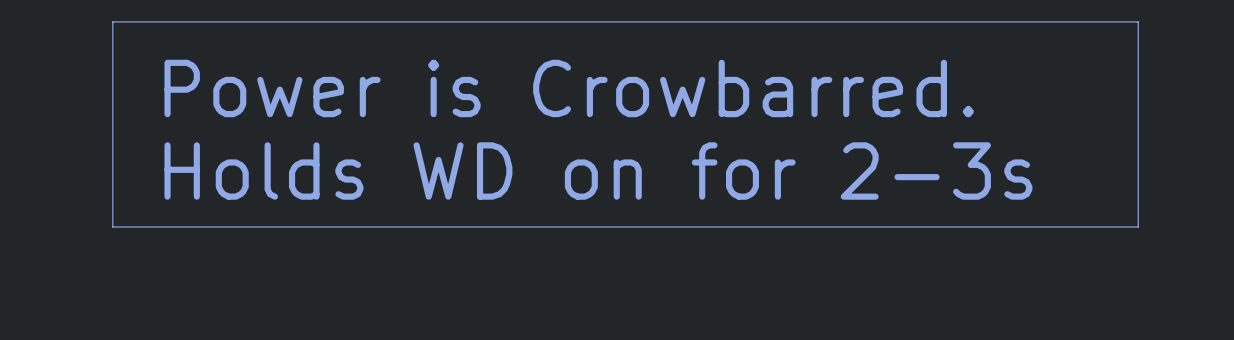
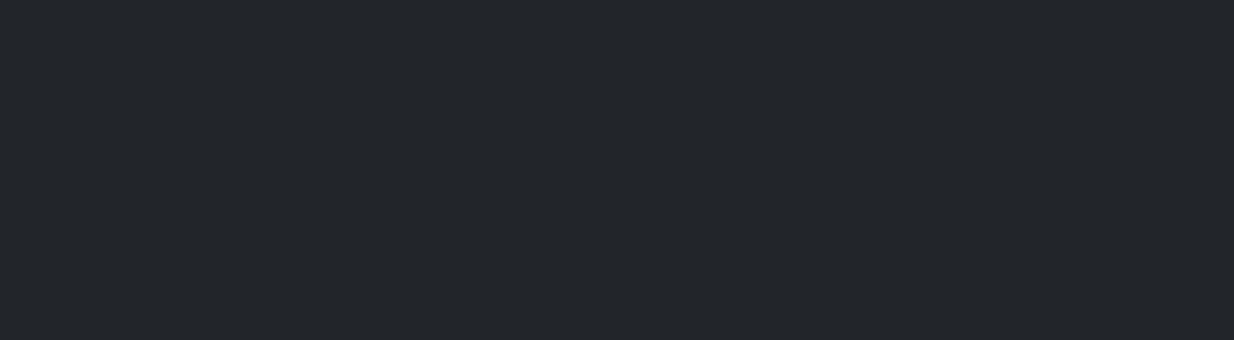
line: (112, 21) (1138, 21) (1138, 227) (112, 227) (112, 21) -> none
text: Power is Crowbarred. (569, 88) -> none
text: Holds WD on for 2-3s (598, 171) -> none

